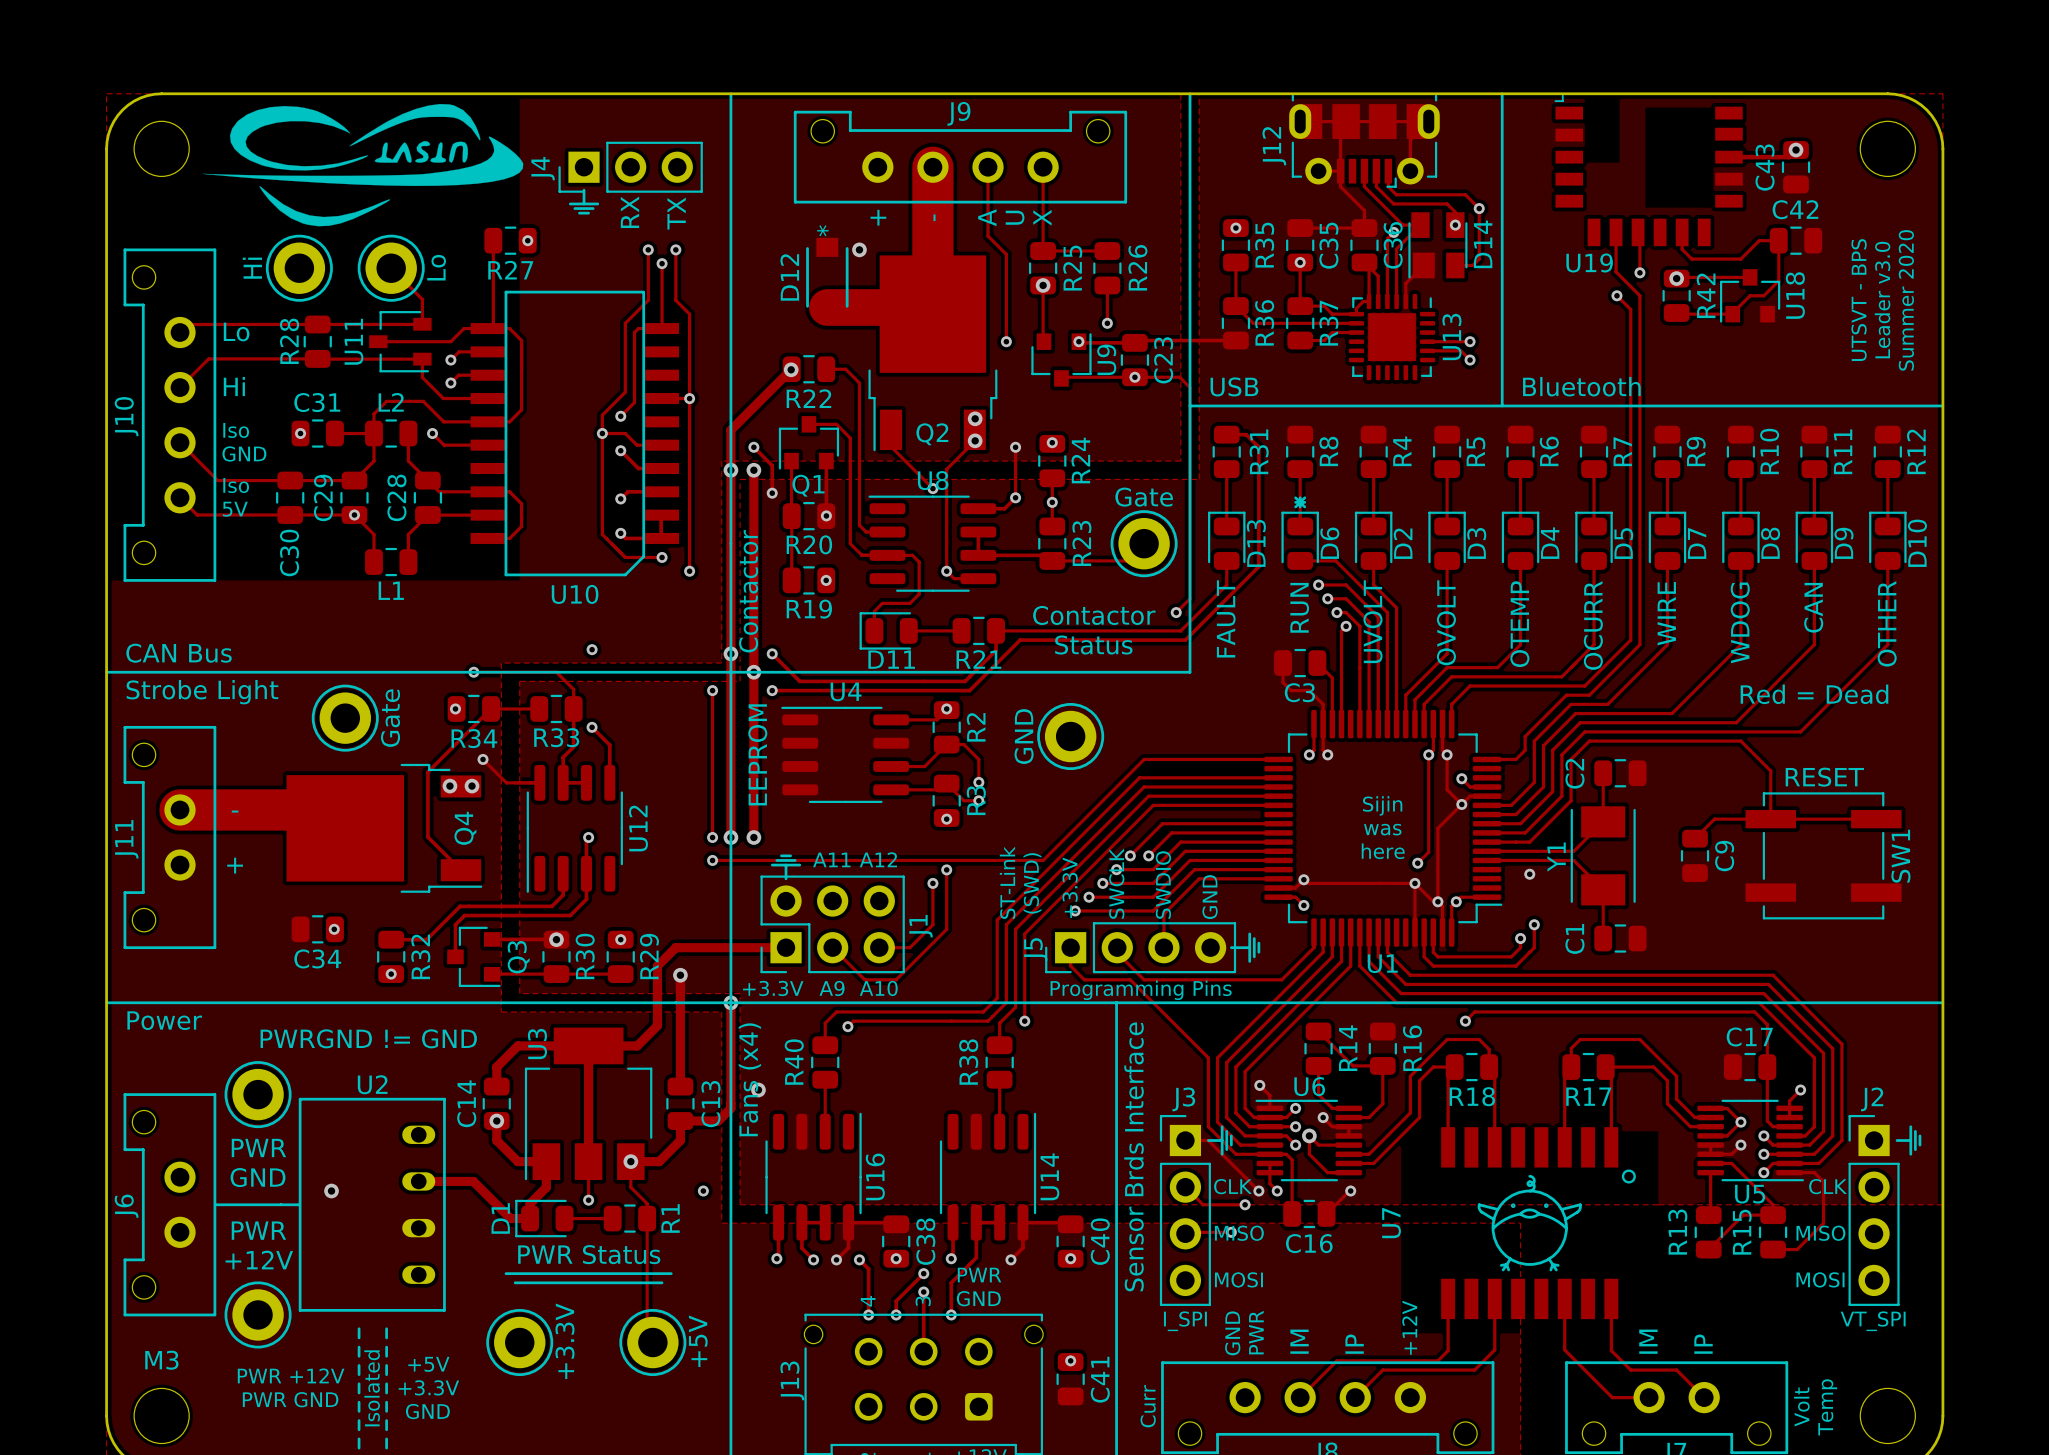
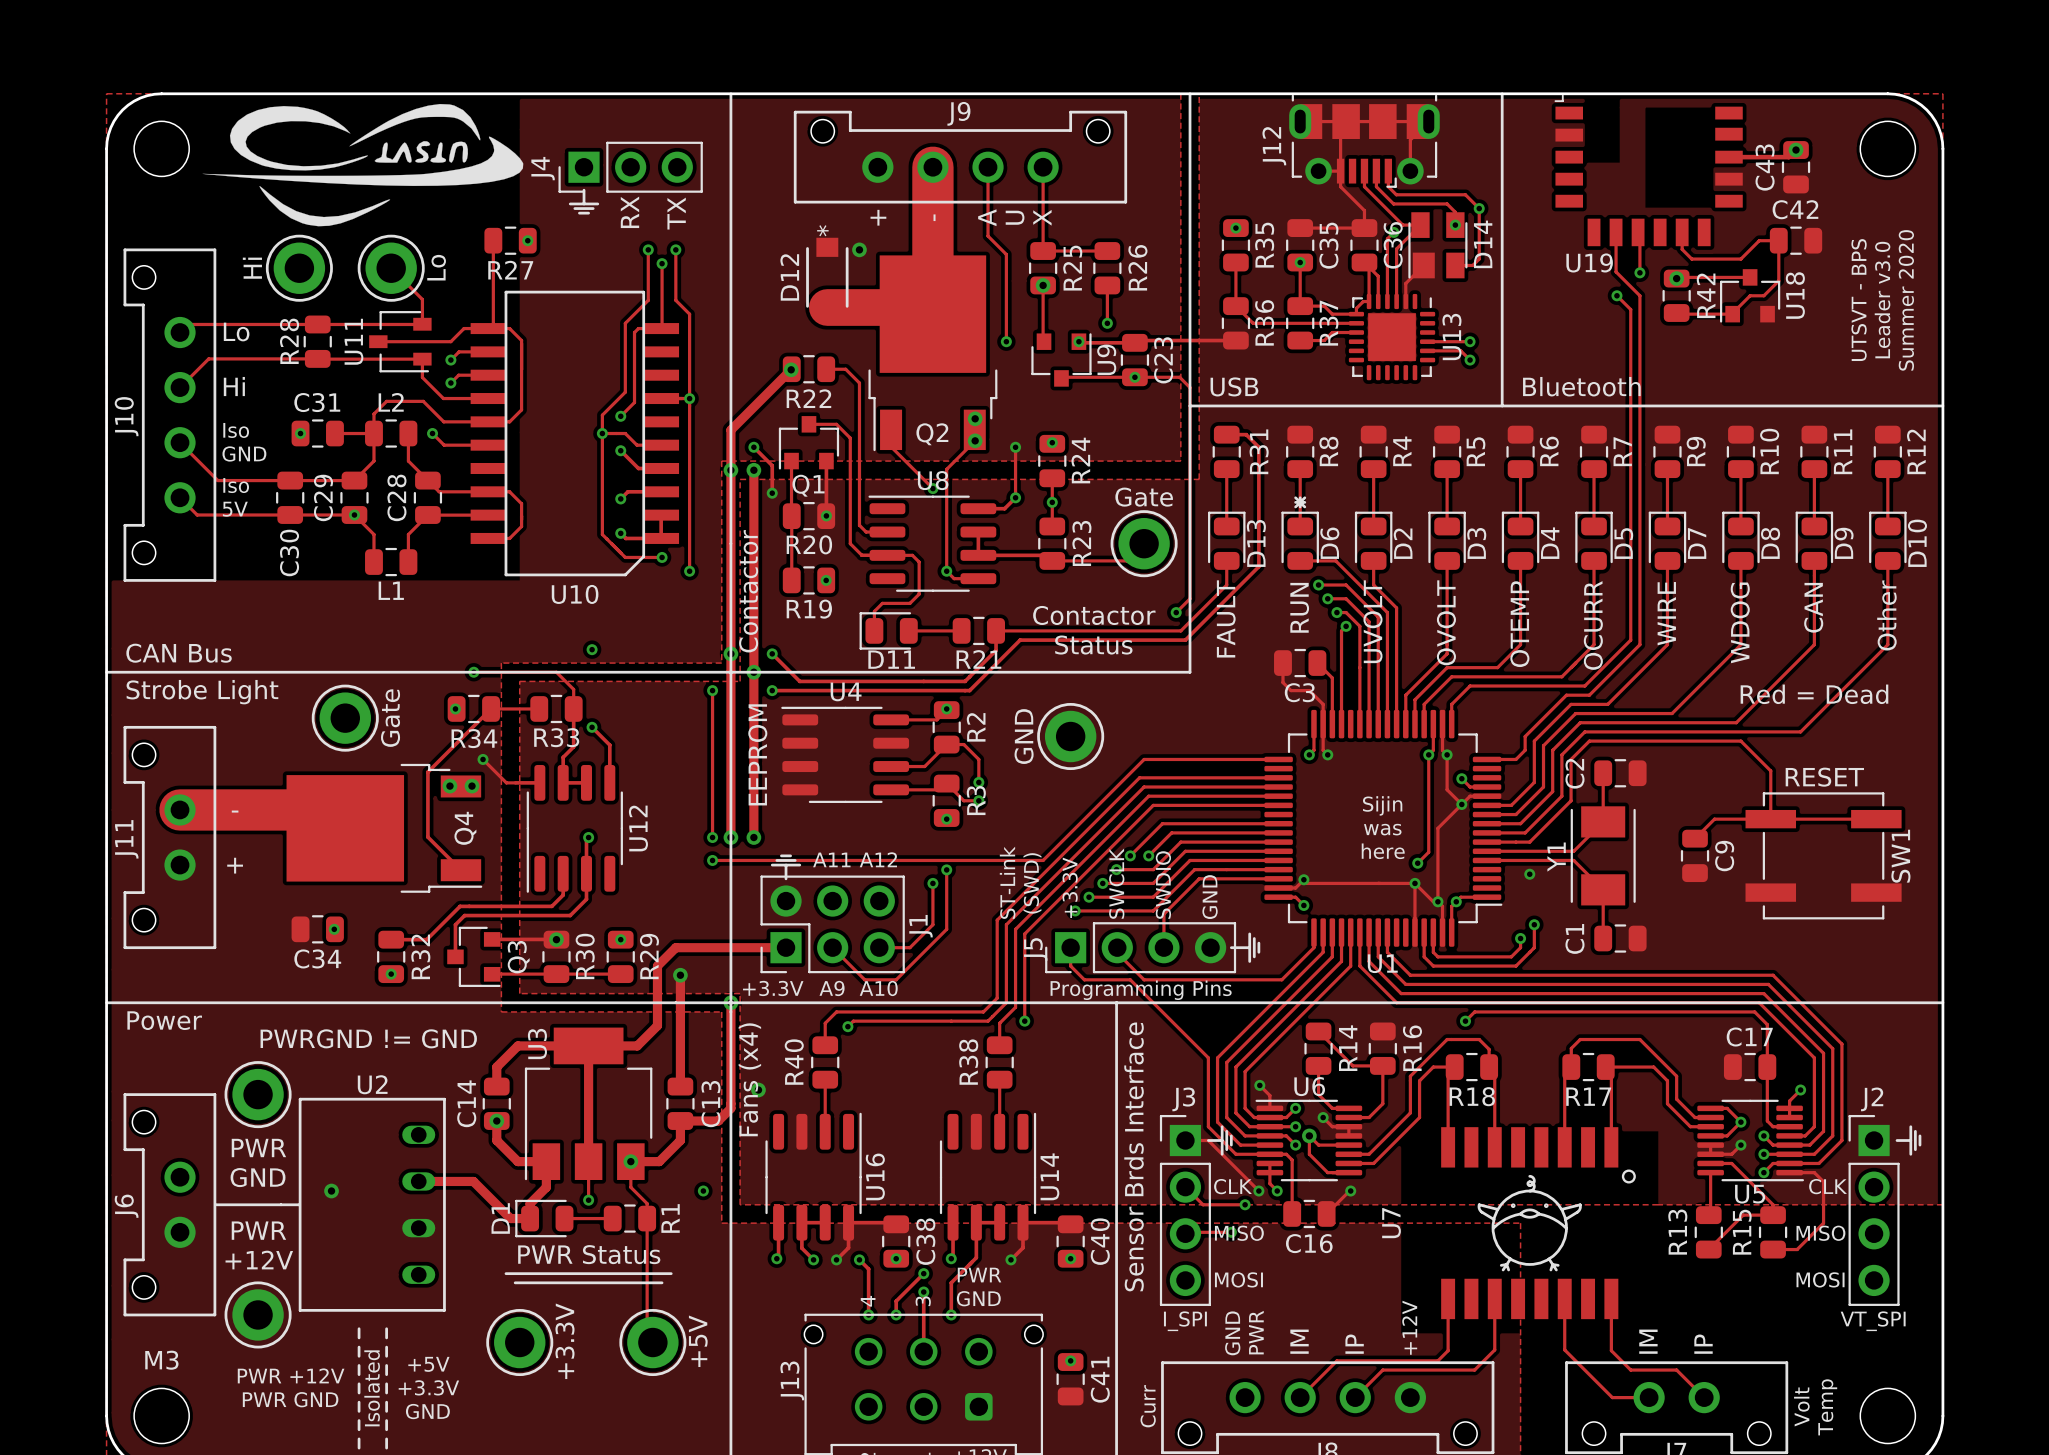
text: OTHER (1887, 623) -> Other (1886, 615)

